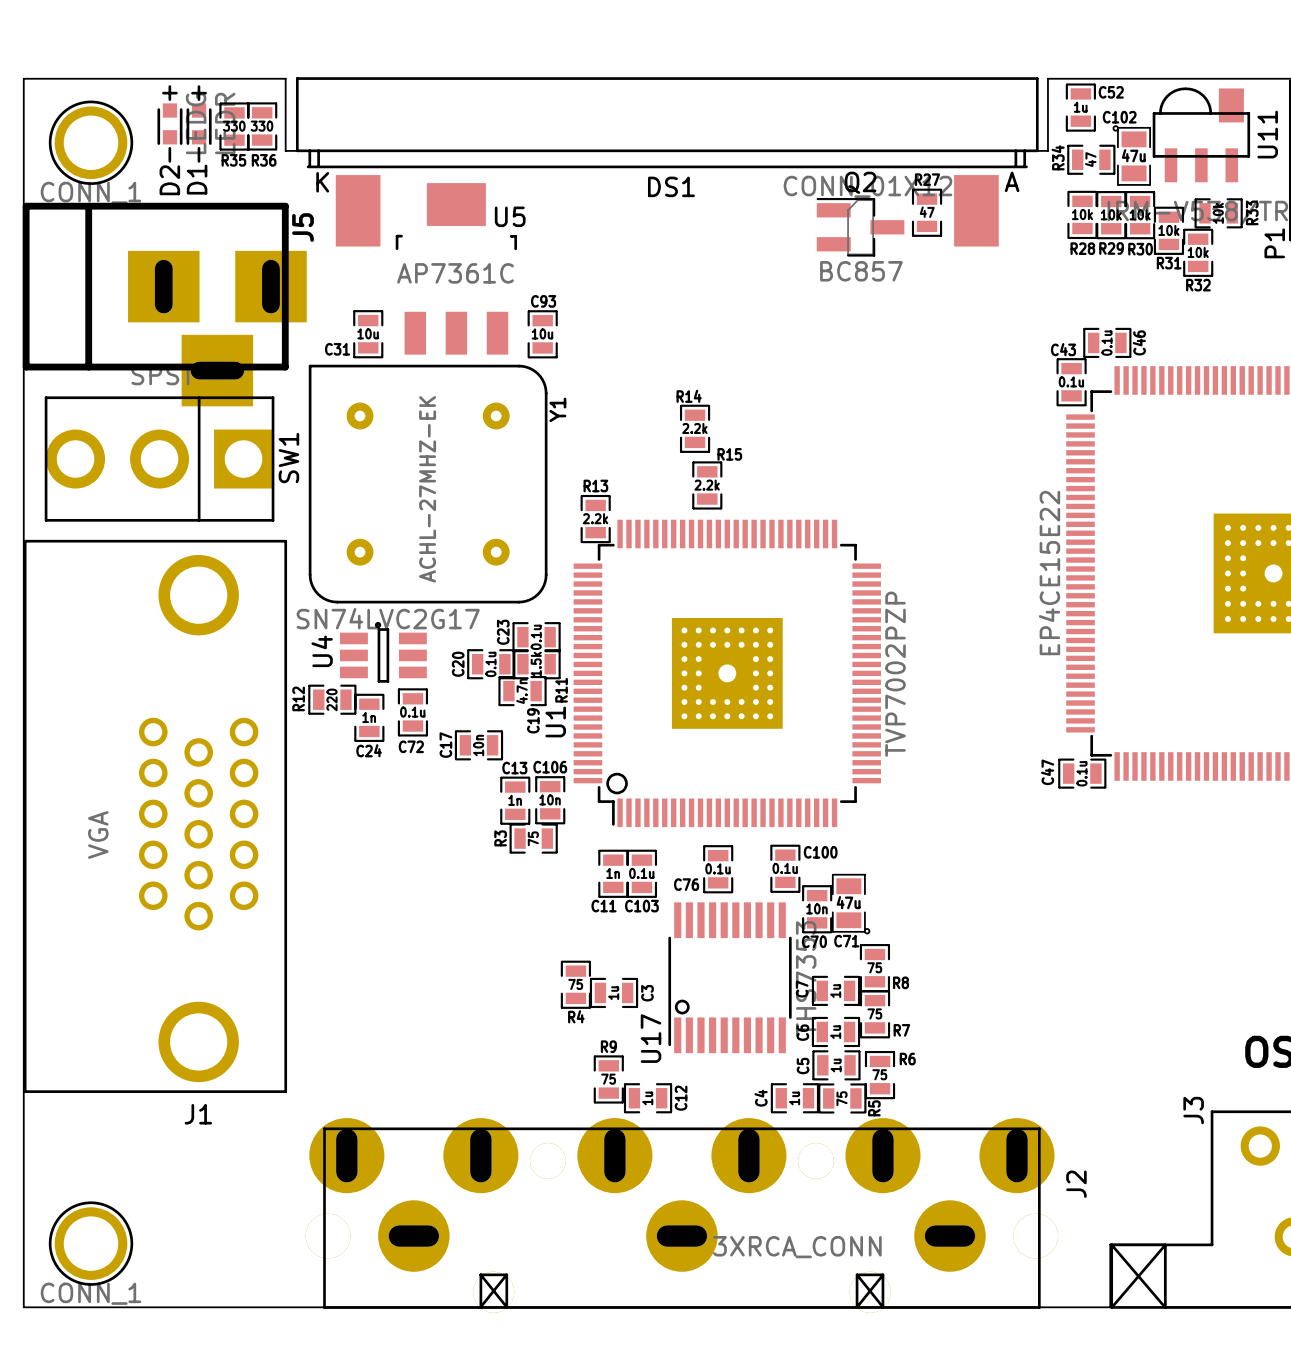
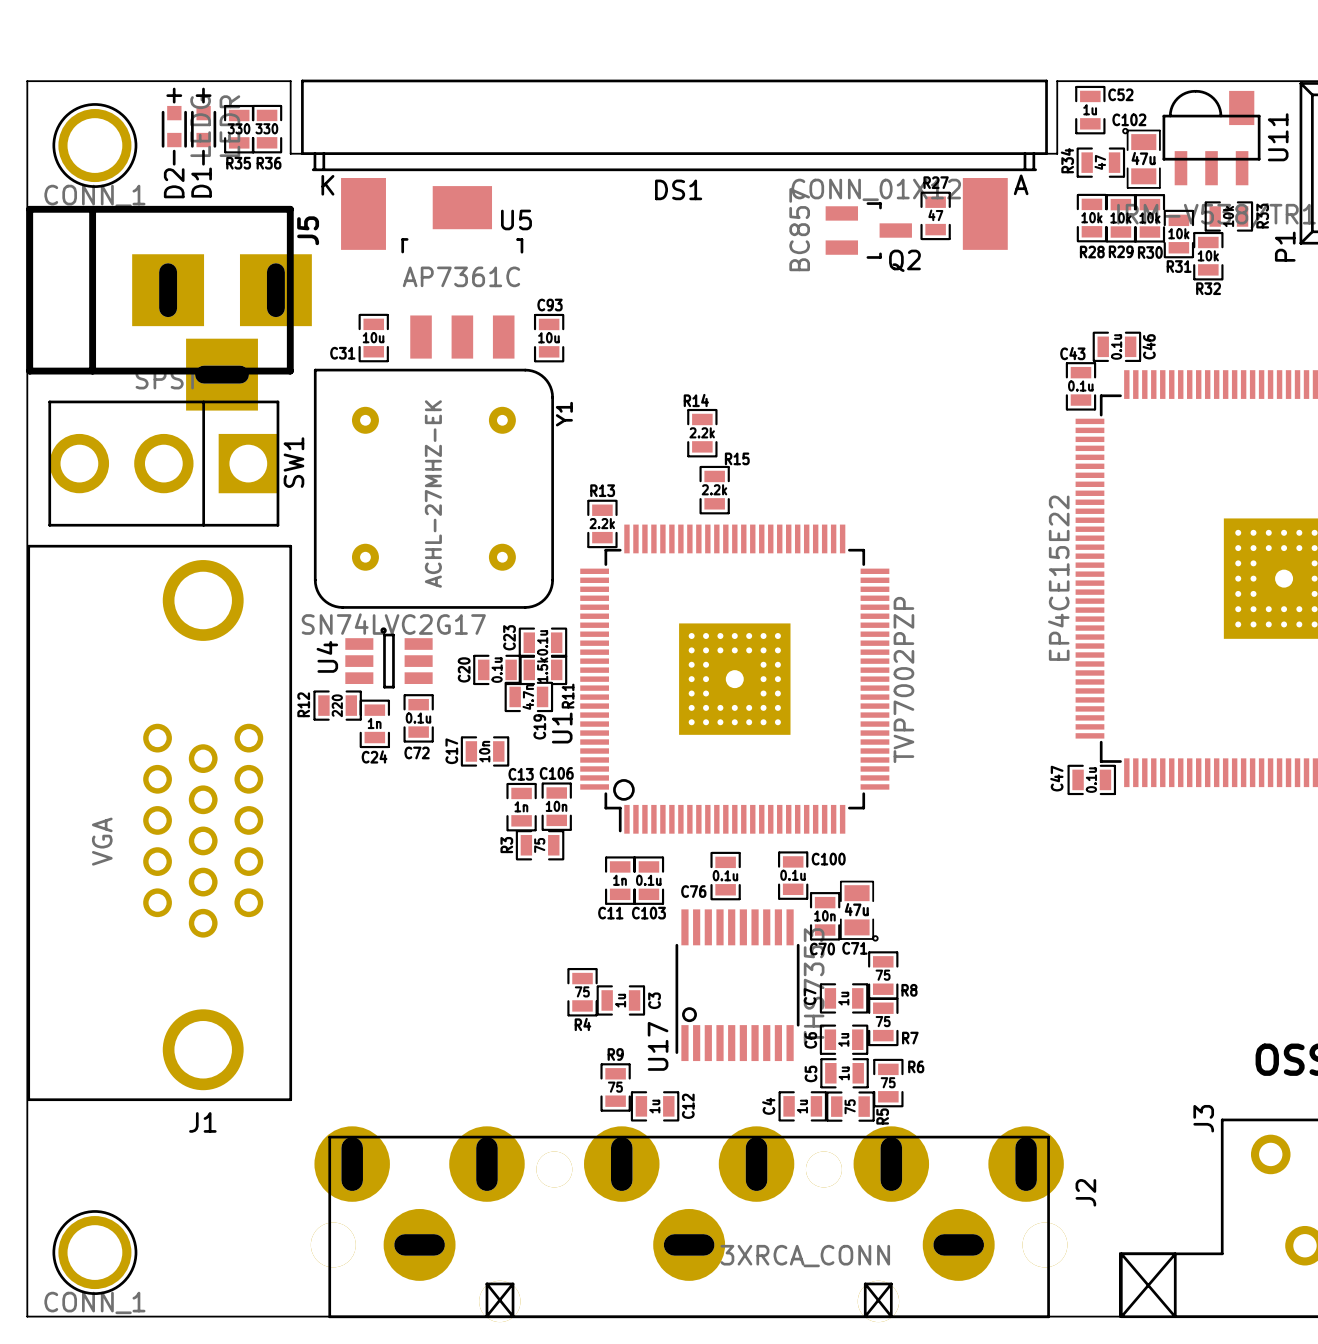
Q2 name position: Q2 (860, 182) -> Q2 (904, 260)
Q2 footprint: [816, 197, 905, 257] -> [825, 202, 912, 259]
Q2 value position: BC857 (861, 271) -> BC857 (799, 229)

